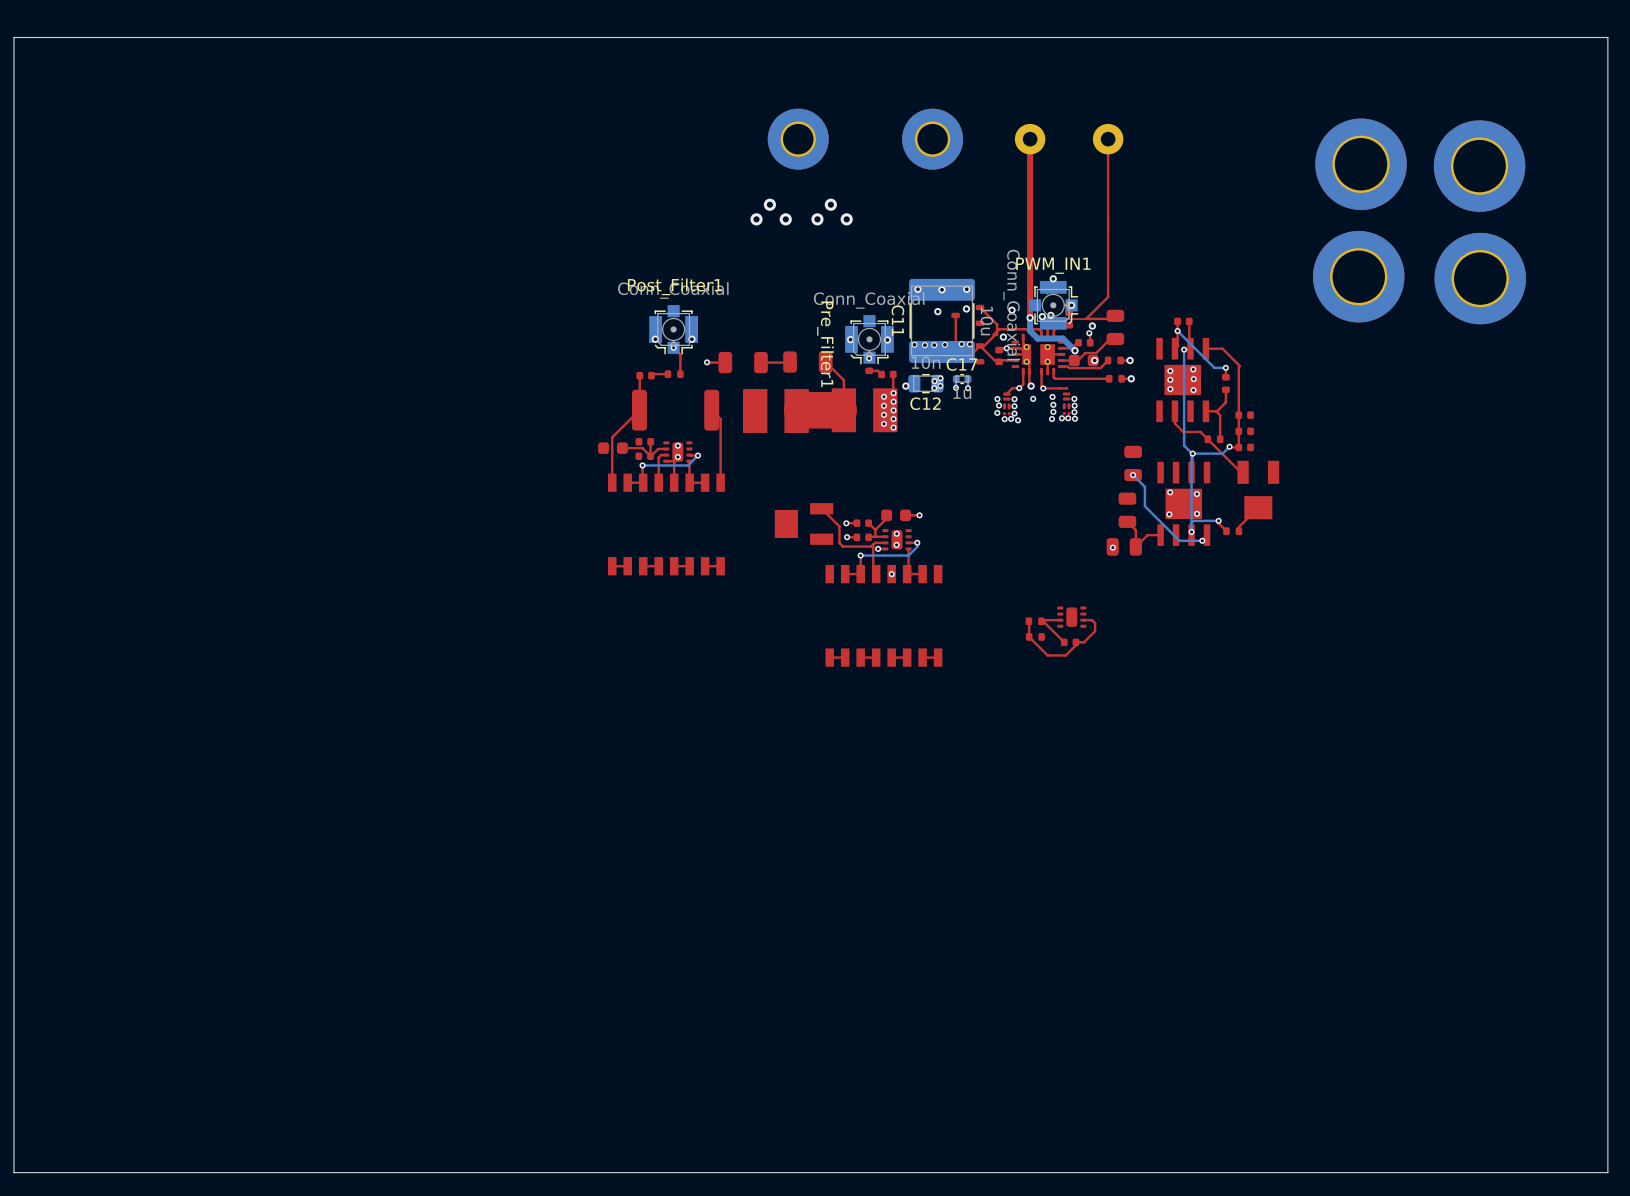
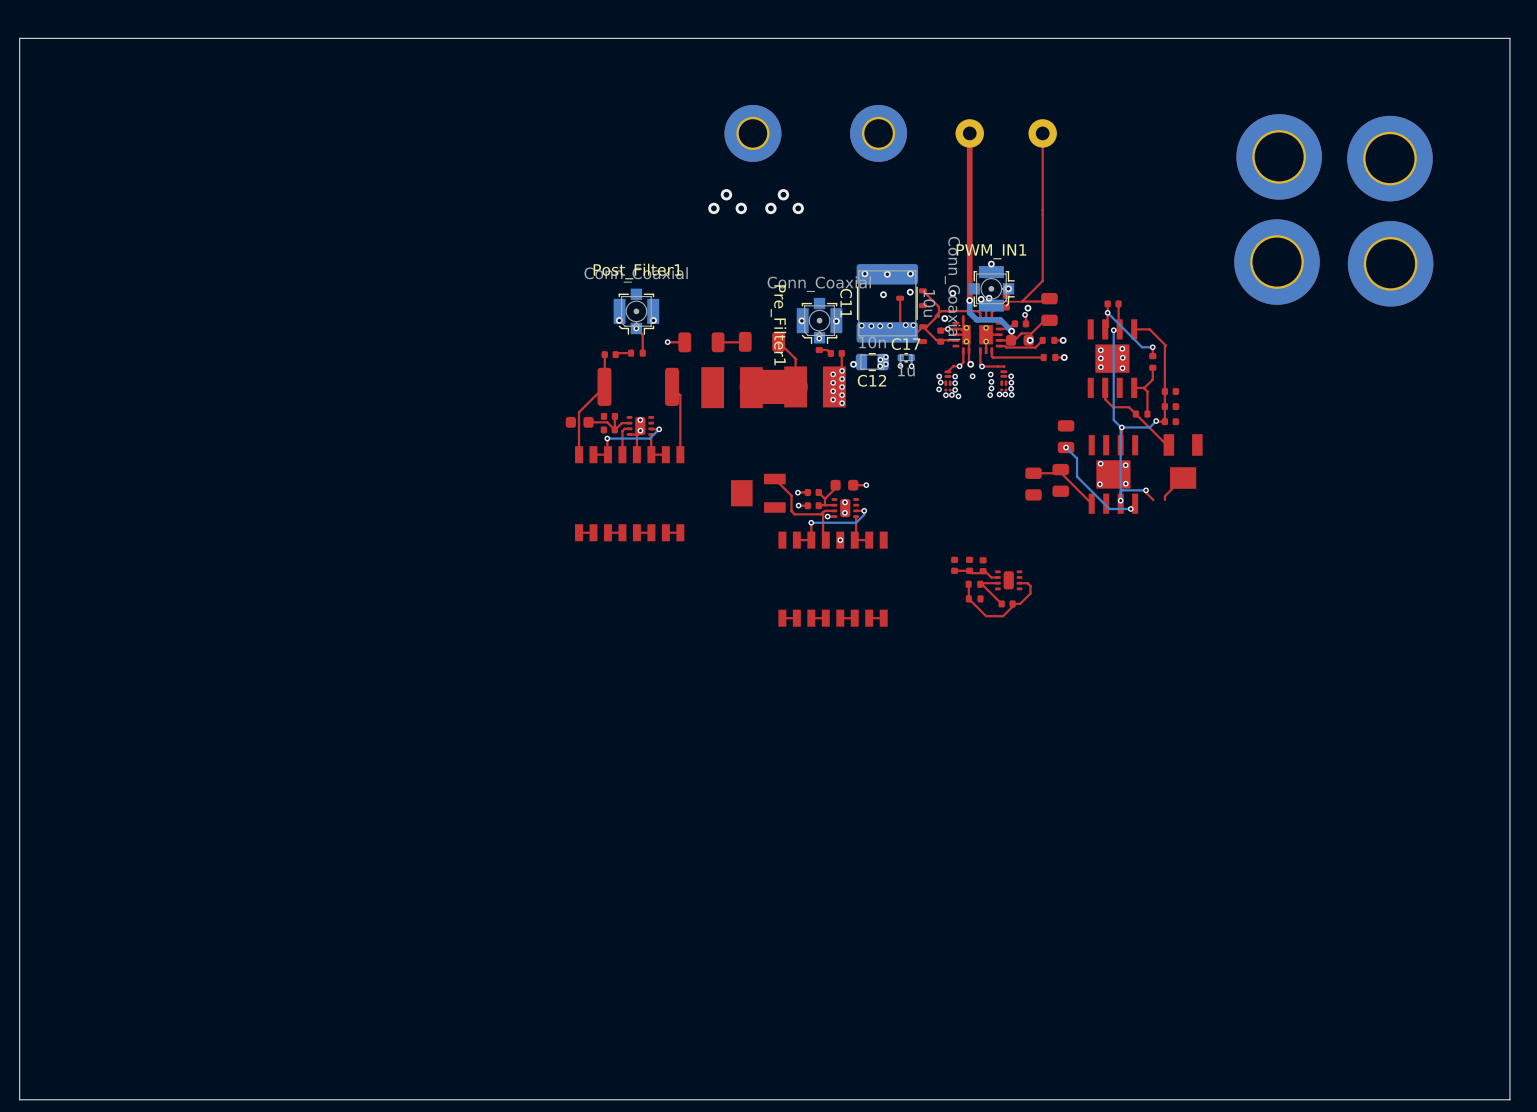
top track: (1127, 521) (1135, 530) (1135, 546) (1147, 535) (1160, 535) -> (1033, 473) (1061, 472) (1091, 503)
part: (1232, 531) -> none
part rotation: 0° (1124, 546) -> 90° clockwise (1033, 484)
part position: (1124, 546) -> (1033, 484)
via: (1112, 547) -> none
part: none -> (954, 565)
part: none -> (969, 565)
part: none -> (983, 565)
top track: none -> (954, 570) (979, 573)
top track: none -> (983, 571) (991, 577) (997, 577)

